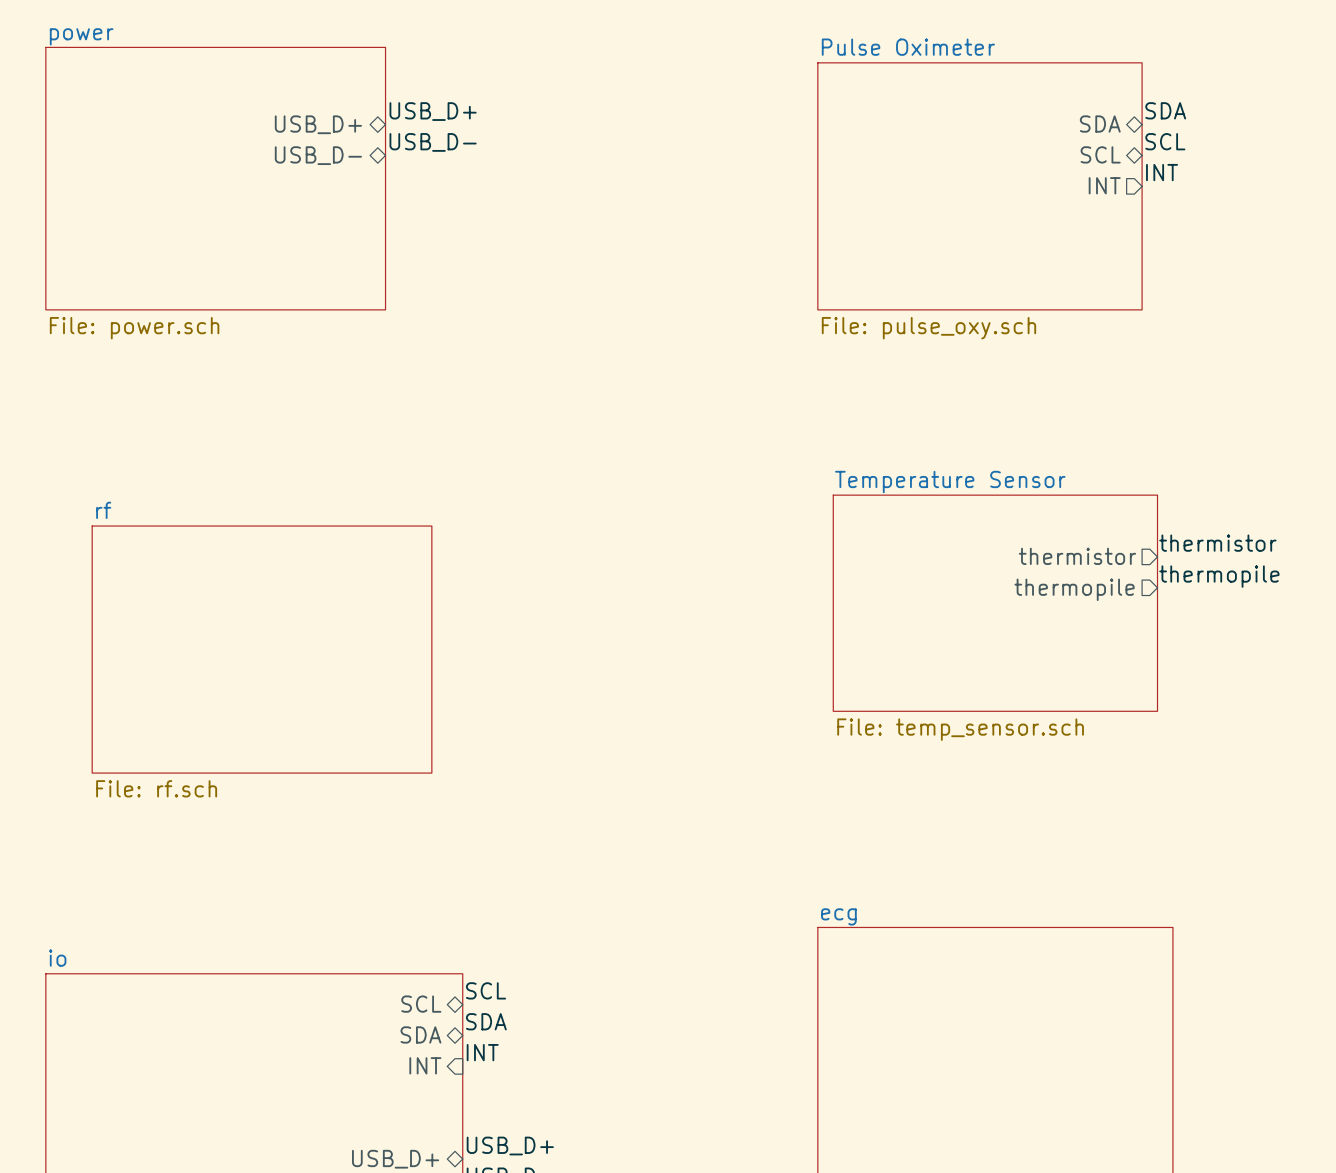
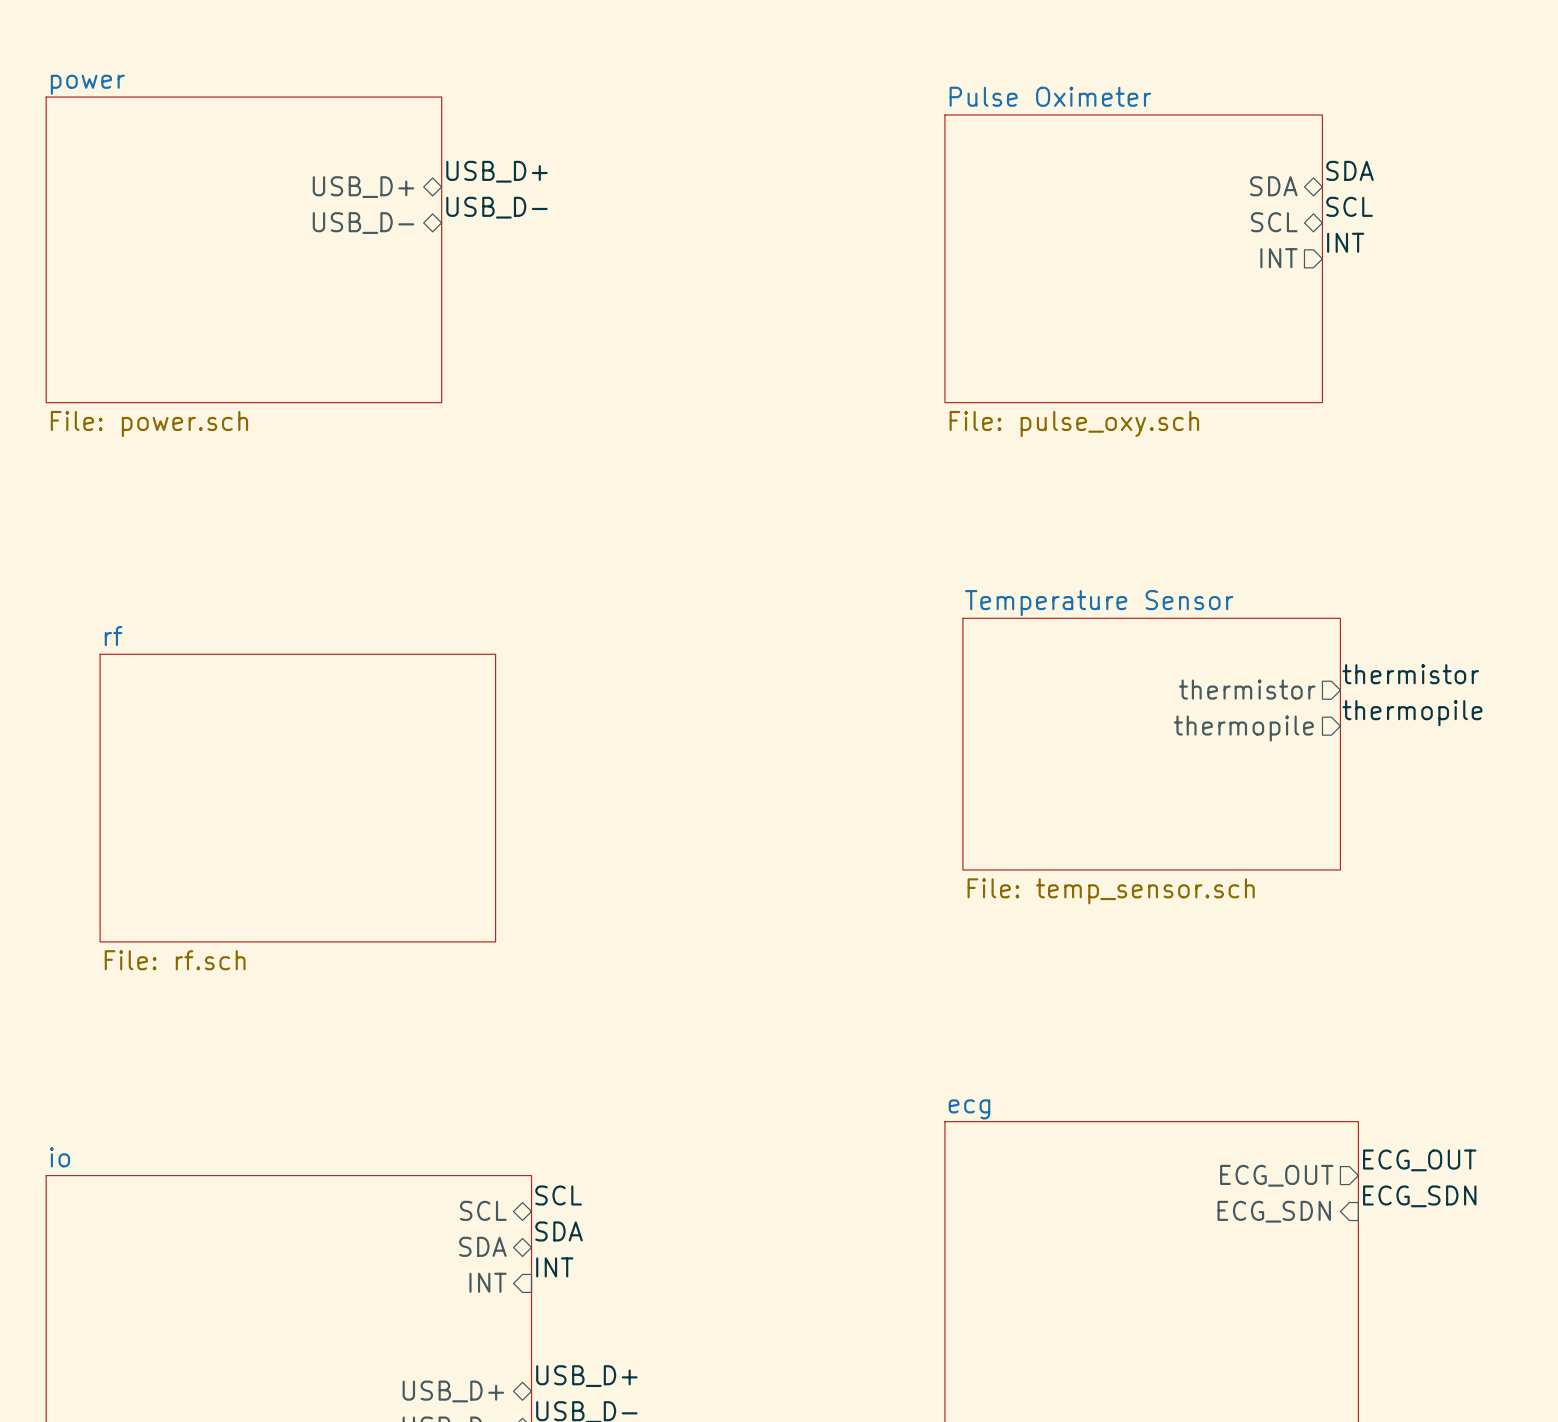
label: none -> ECG_OUT (1419, 1160)
sheet pin: none -> ECG_OUT (1276, 1175)
label: none -> ECG_SDN (1419, 1196)
sheet pin: none -> ECG_SDN (1274, 1211)

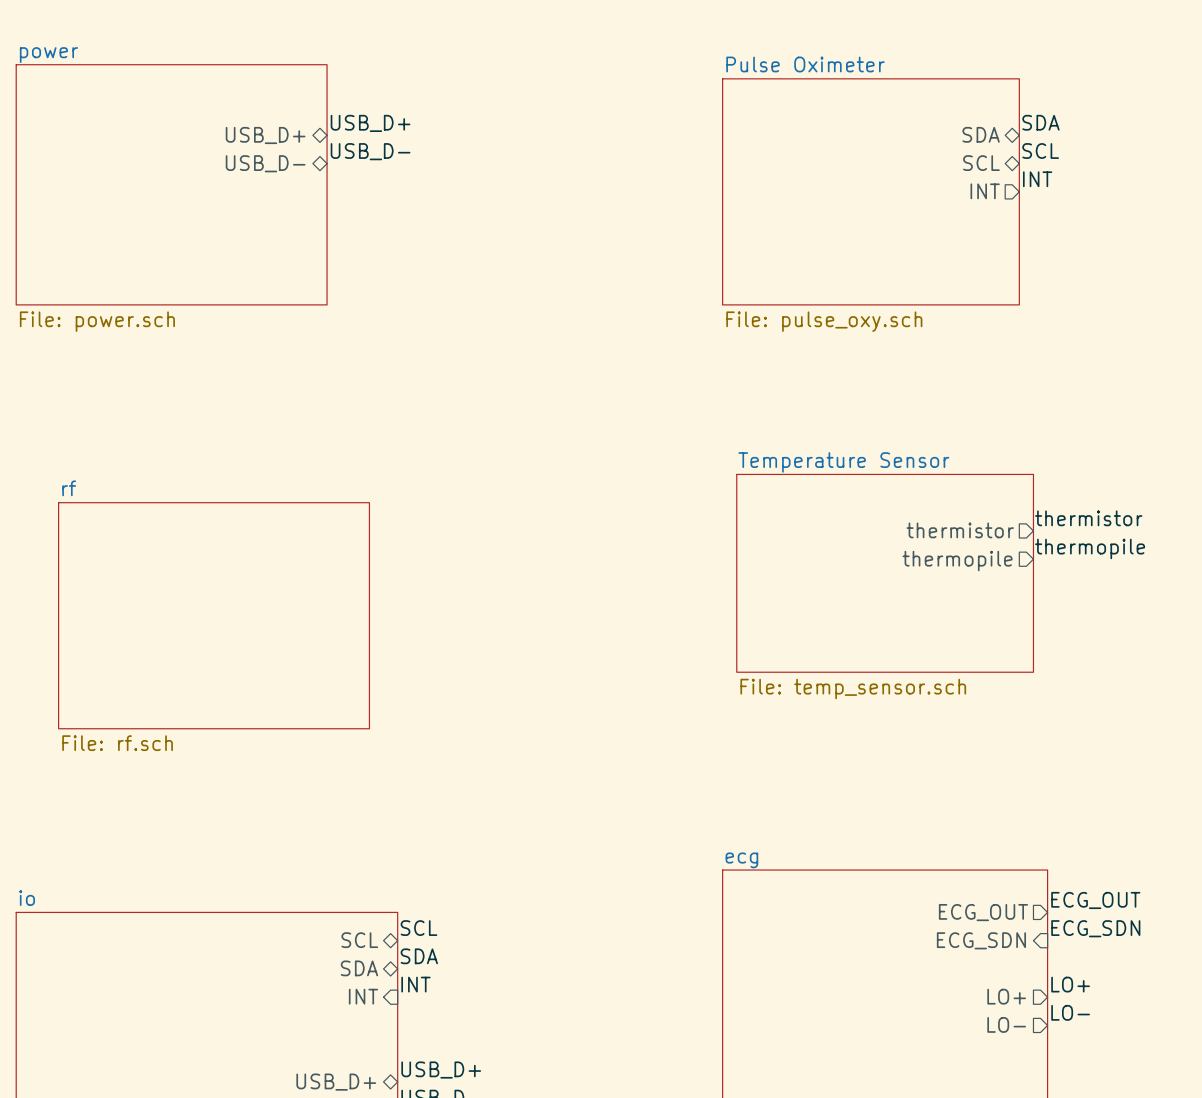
label: none -> LO+ (1070, 984)
sheet pin: none -> LO+ (1006, 996)
label: none -> LO- (1070, 1012)
sheet pin: none -> LO- (1006, 1024)

